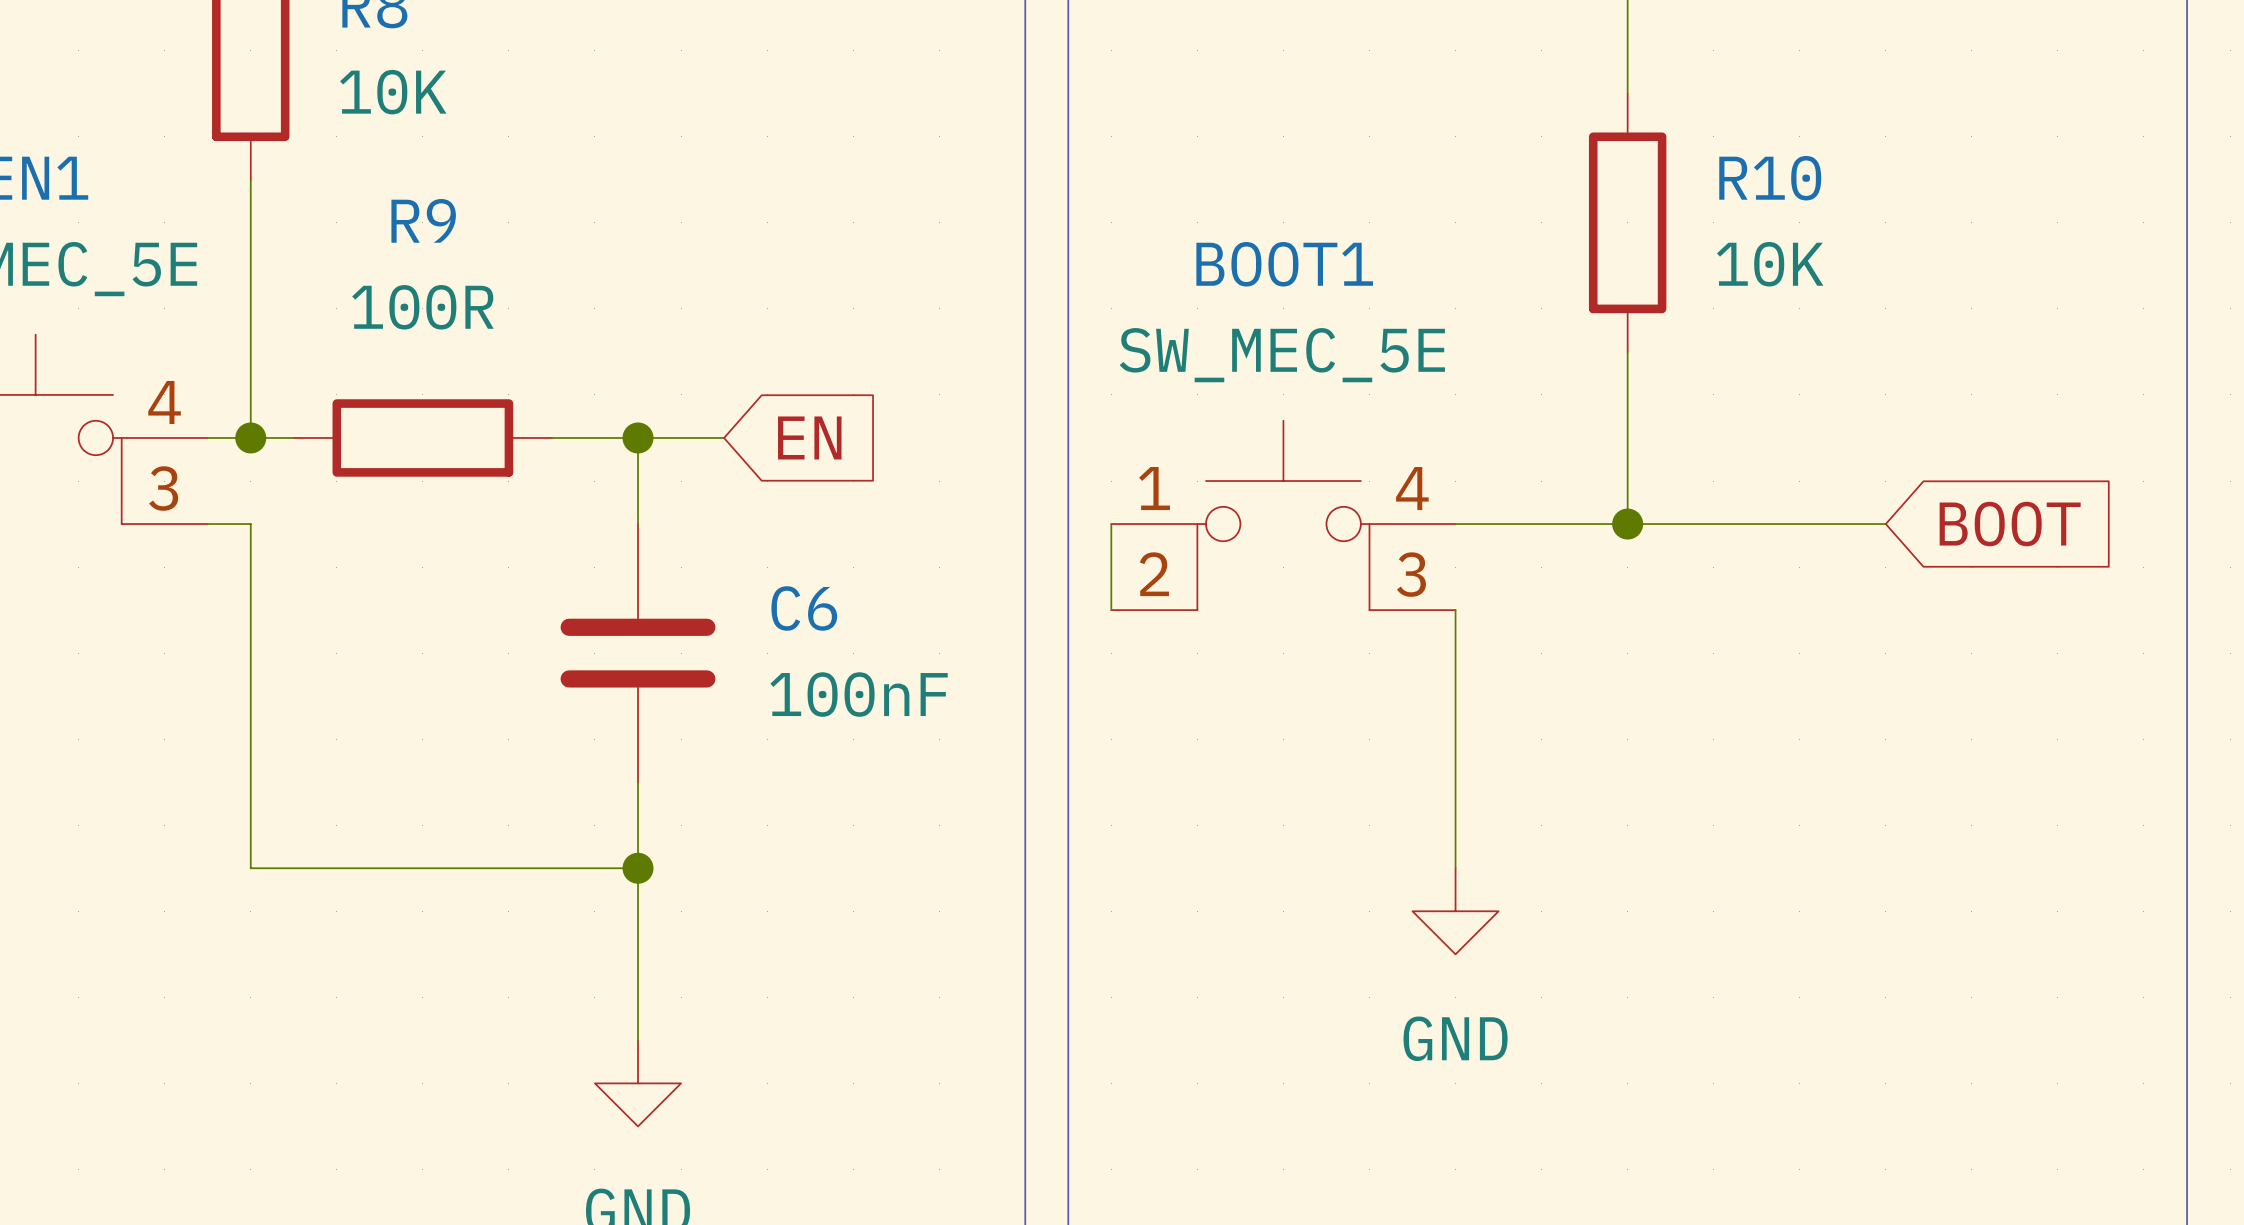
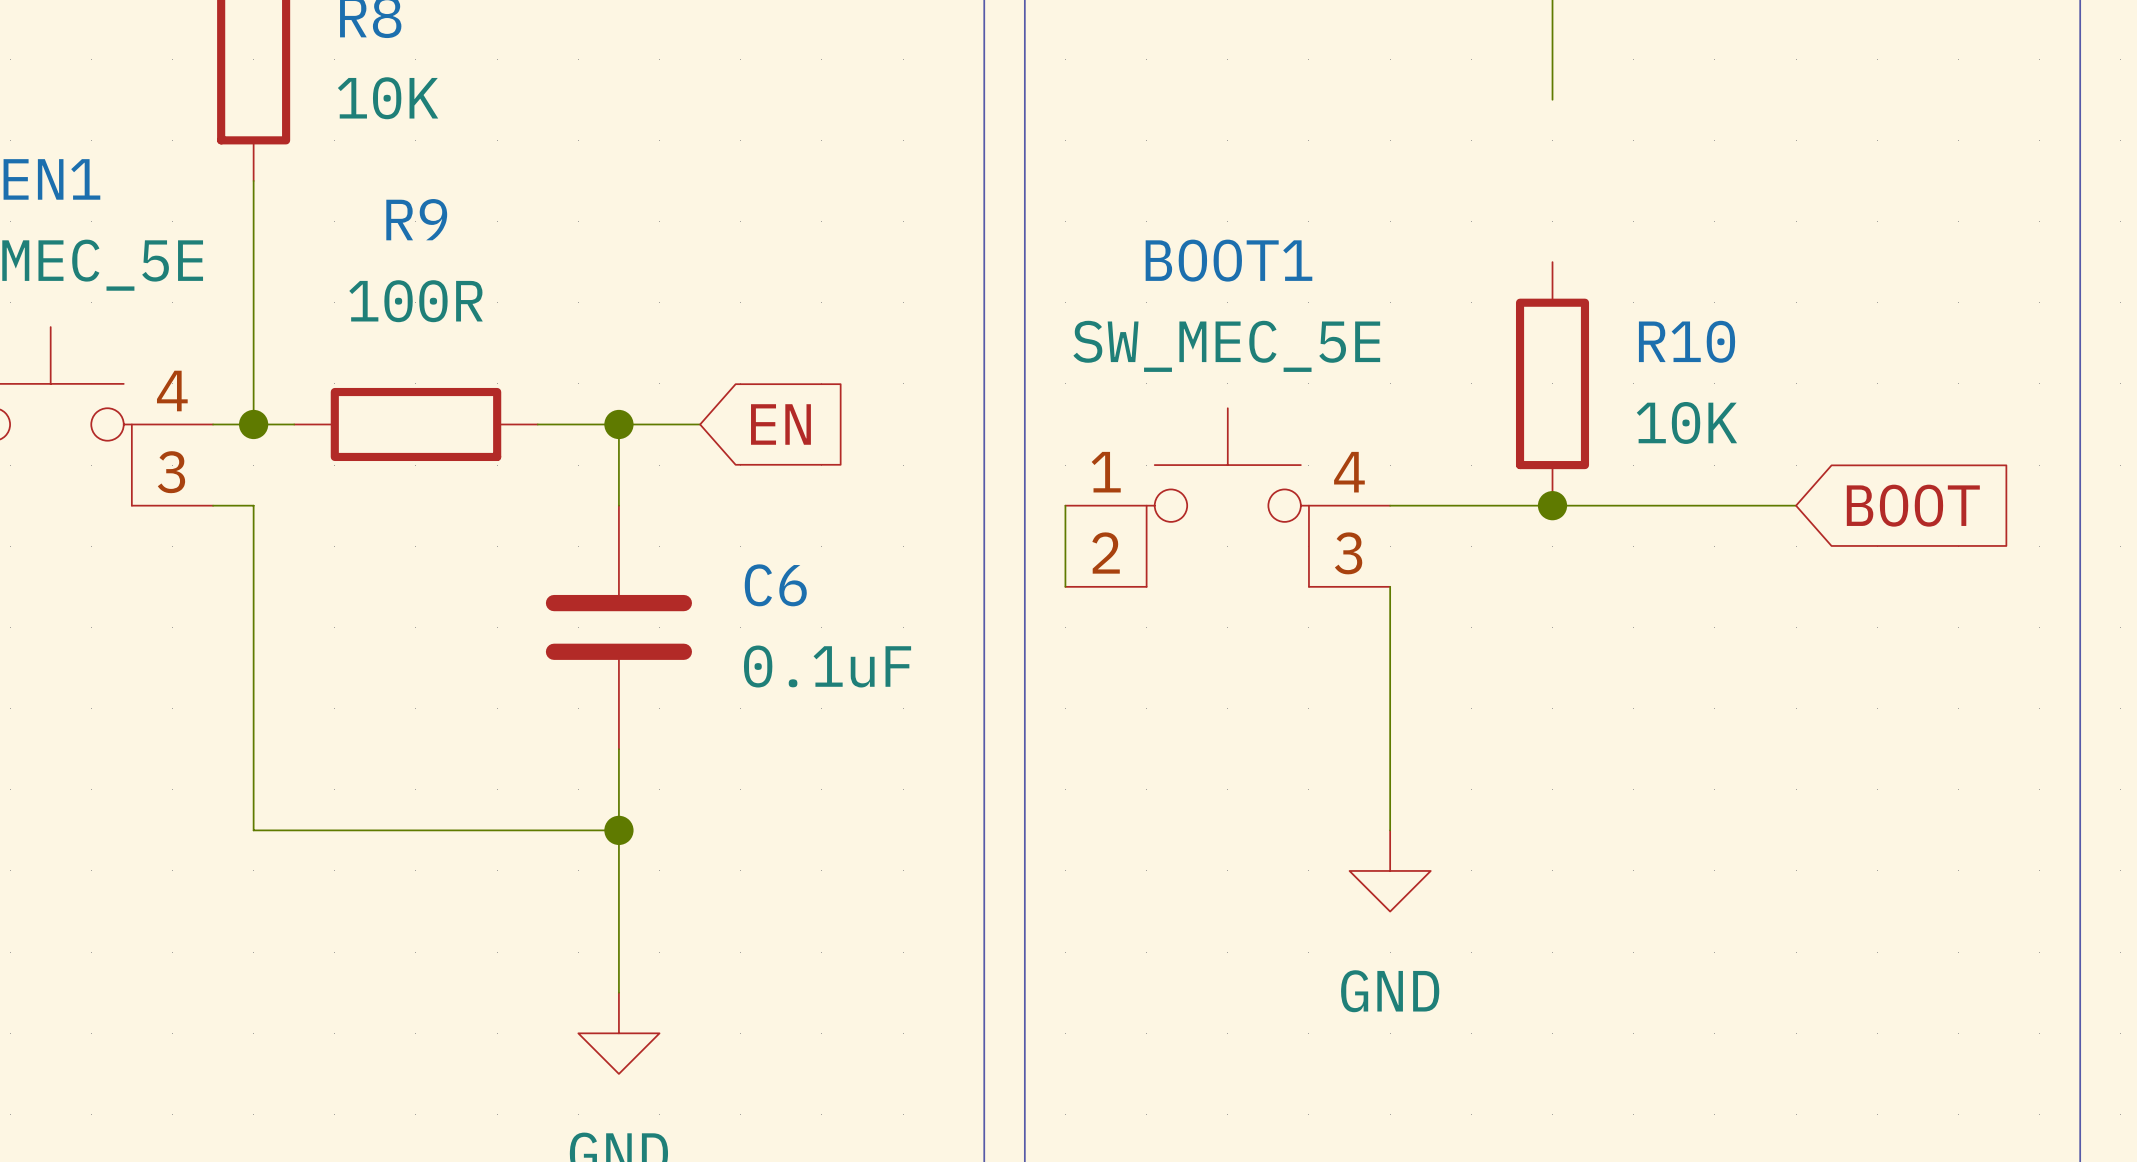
R10 position: (1627, 222) -> (1552, 383)
wire: (1627, 351) (1627, 524) -> none
C6 value: 100nF (859, 694) -> 0.1uF (827, 666)

